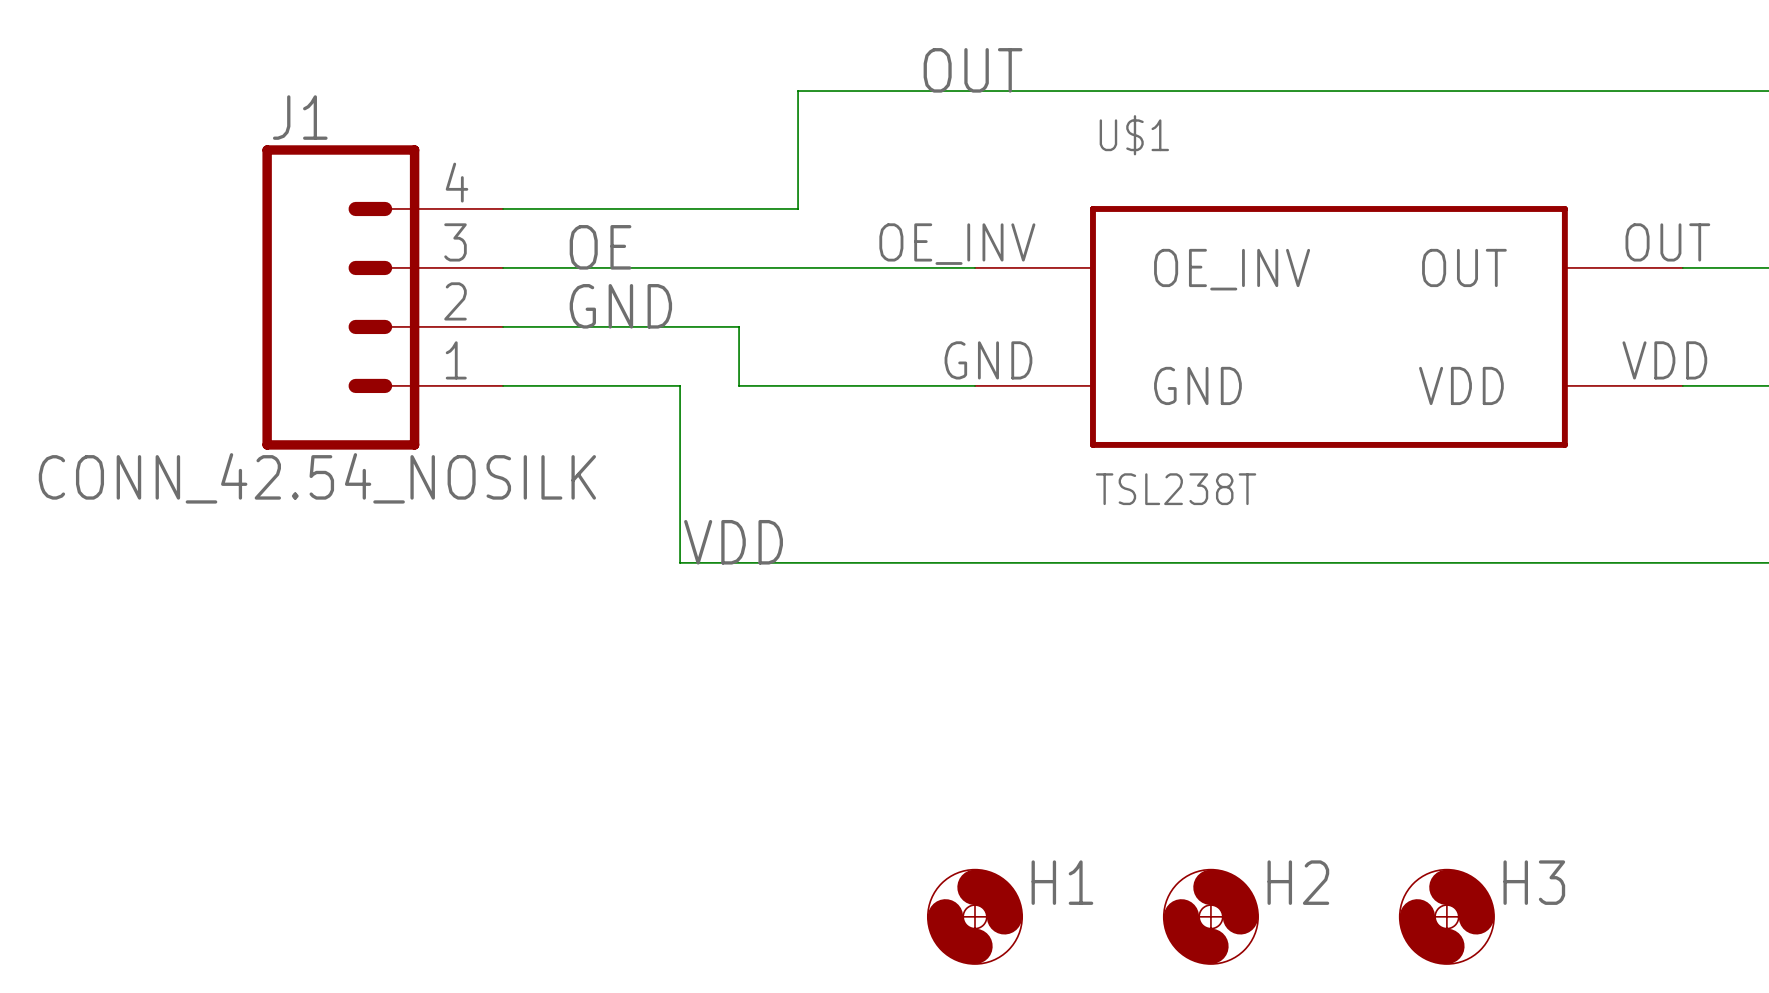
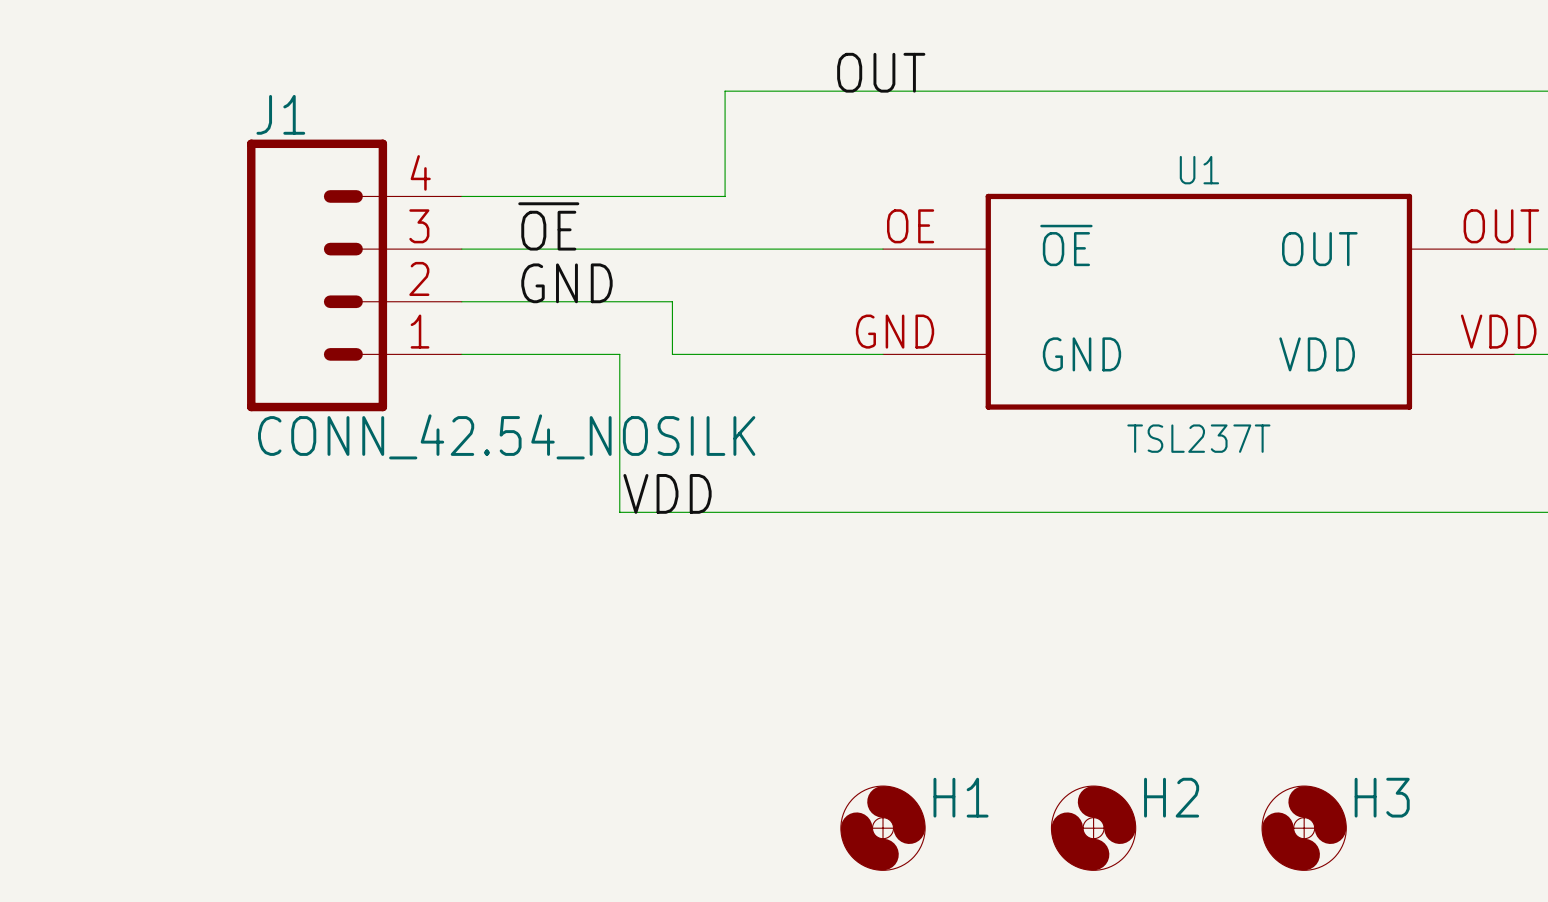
U$1 name: U$1 (1134, 135) -> U1 (1199, 170)
U$1 pin number: OE_INV (957, 244) -> OE (910, 226)
label: OE (600, 247) -> ~{OE} (548, 226)
U$1 pin name: OE_INV (1232, 269) -> ~{OE} (1066, 245)
J1 value position: CONN_42.54_NOSILK (317, 478) -> CONN_42.54_NOSILK (506, 436)
U$1 text: none -> TSL237T (1198, 438)
U$1 text: TSL238T (1176, 489) -> none

